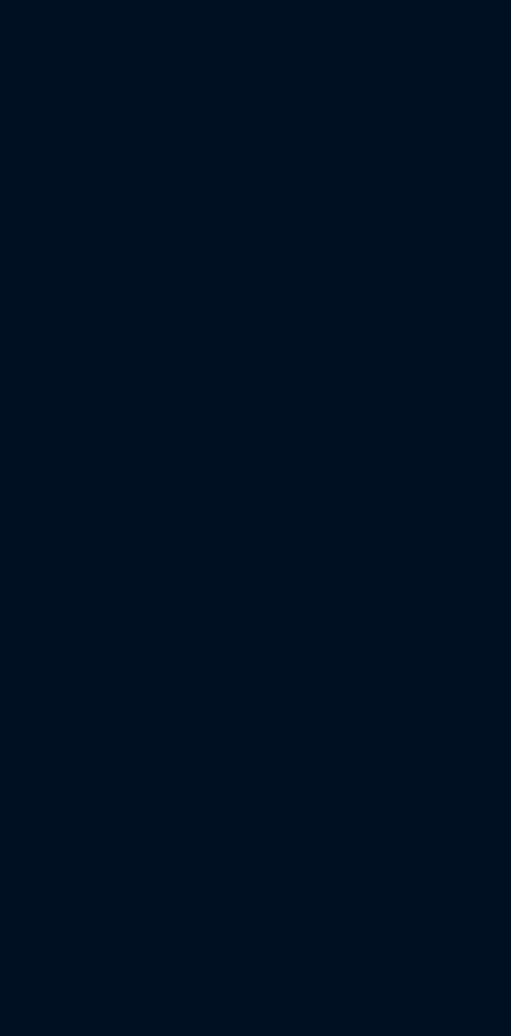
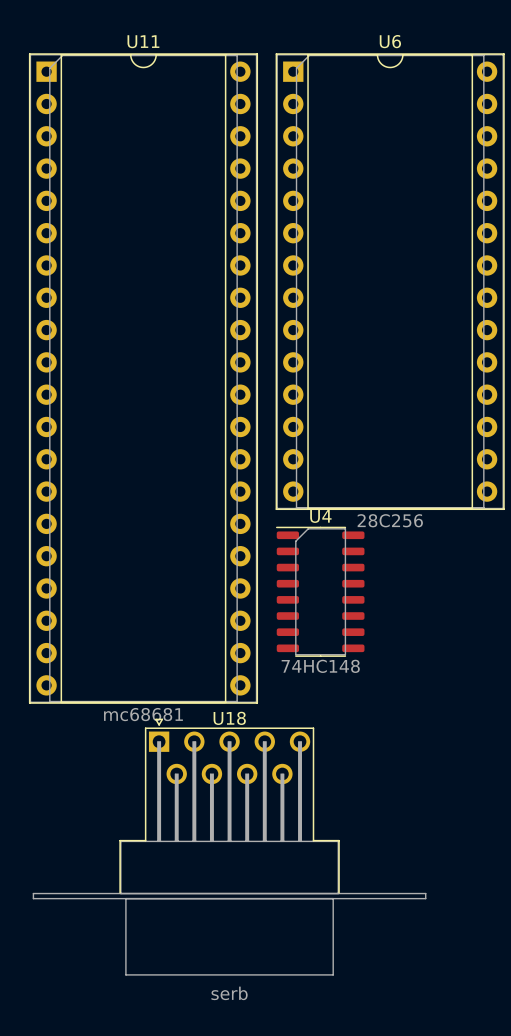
U6: none -> 28C256 (390, 281)
U11: none -> mc68681 (143, 378)
U4: none -> 74HC148 (320, 591)
U18: none -> serb (229, 847)

